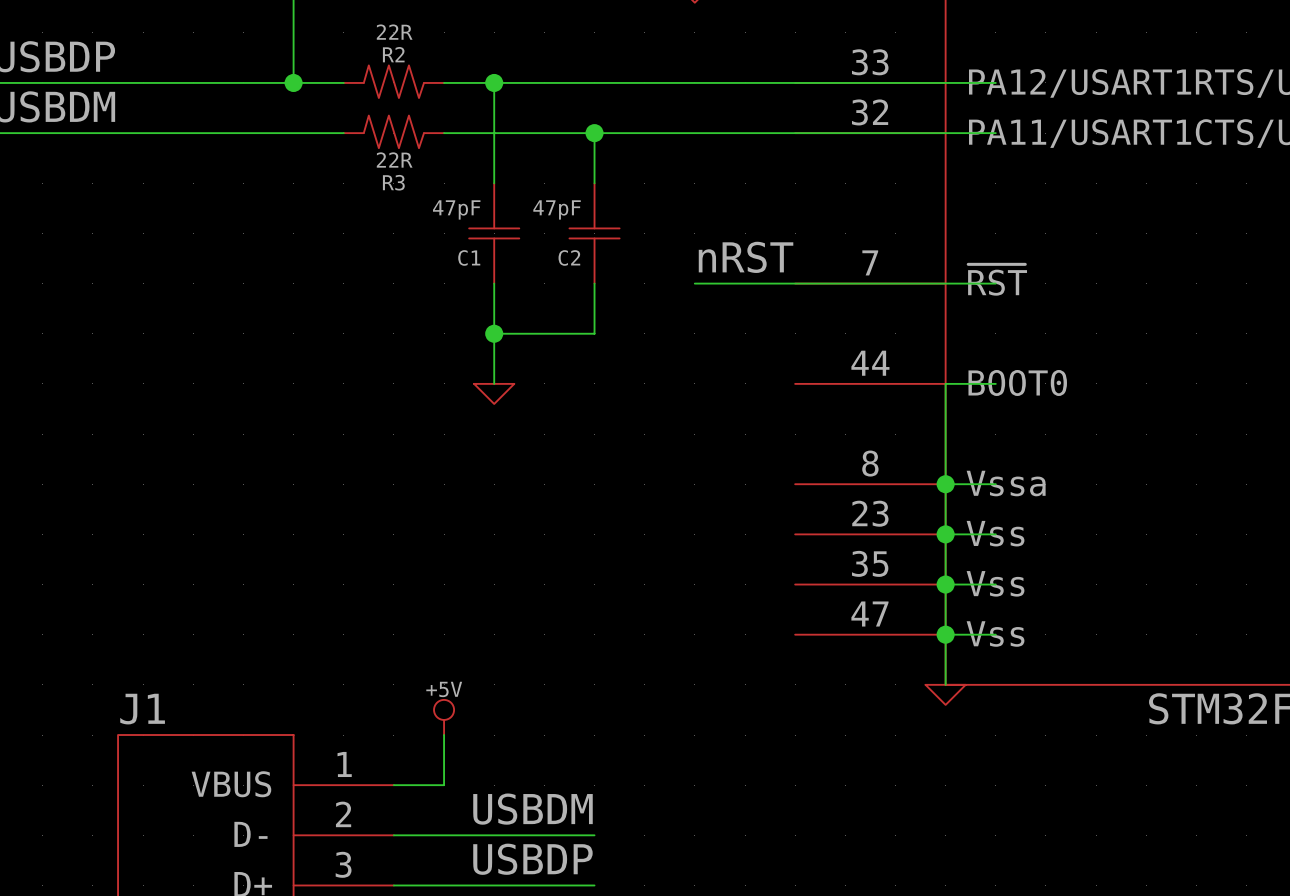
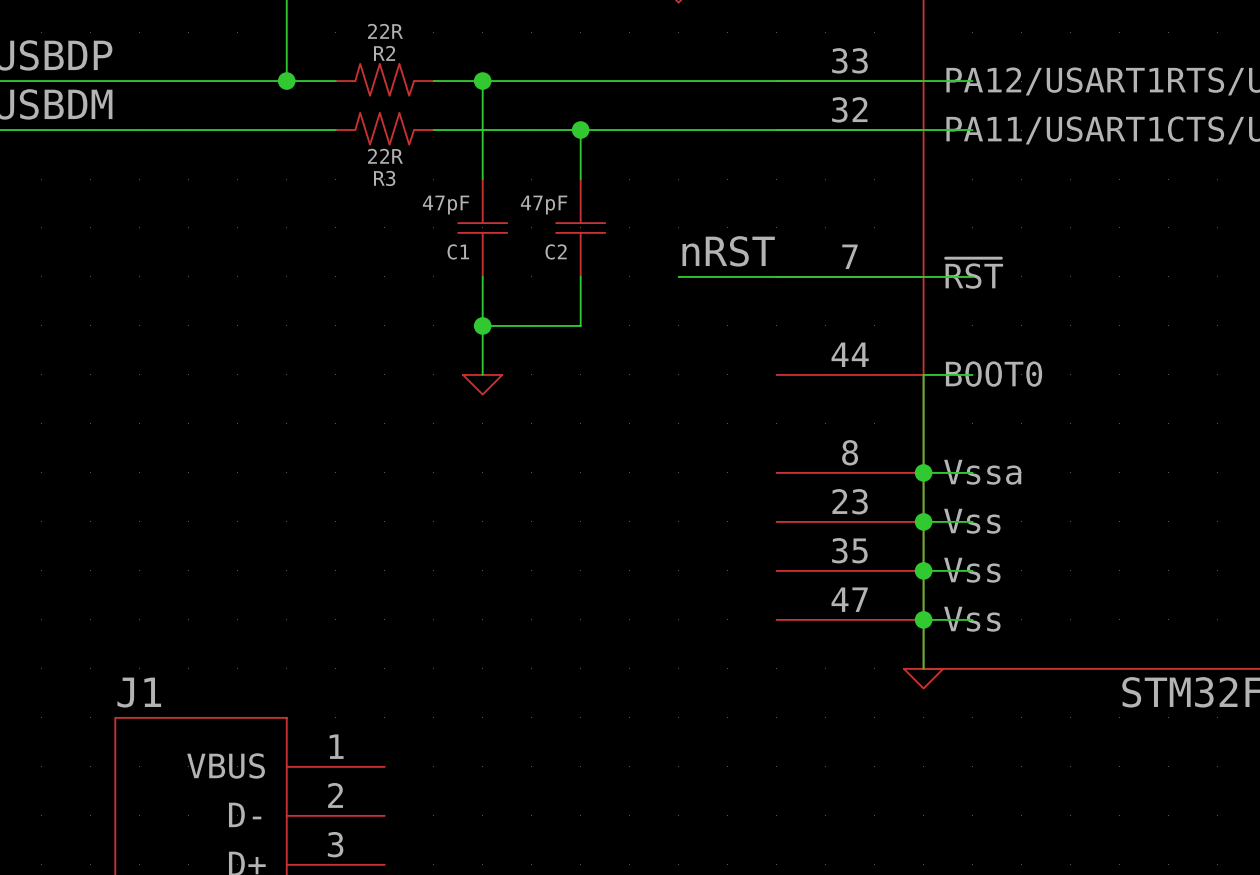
power symbol: +5V (444, 717) -> none
wire: (444, 735) (444, 785) (393, 785) -> none
label: USBDM (532, 809) -> none
wire: (393, 835) (594, 835) -> none
label: USBDP (532, 859) -> none
wire: (393, 885) (594, 885) -> none

